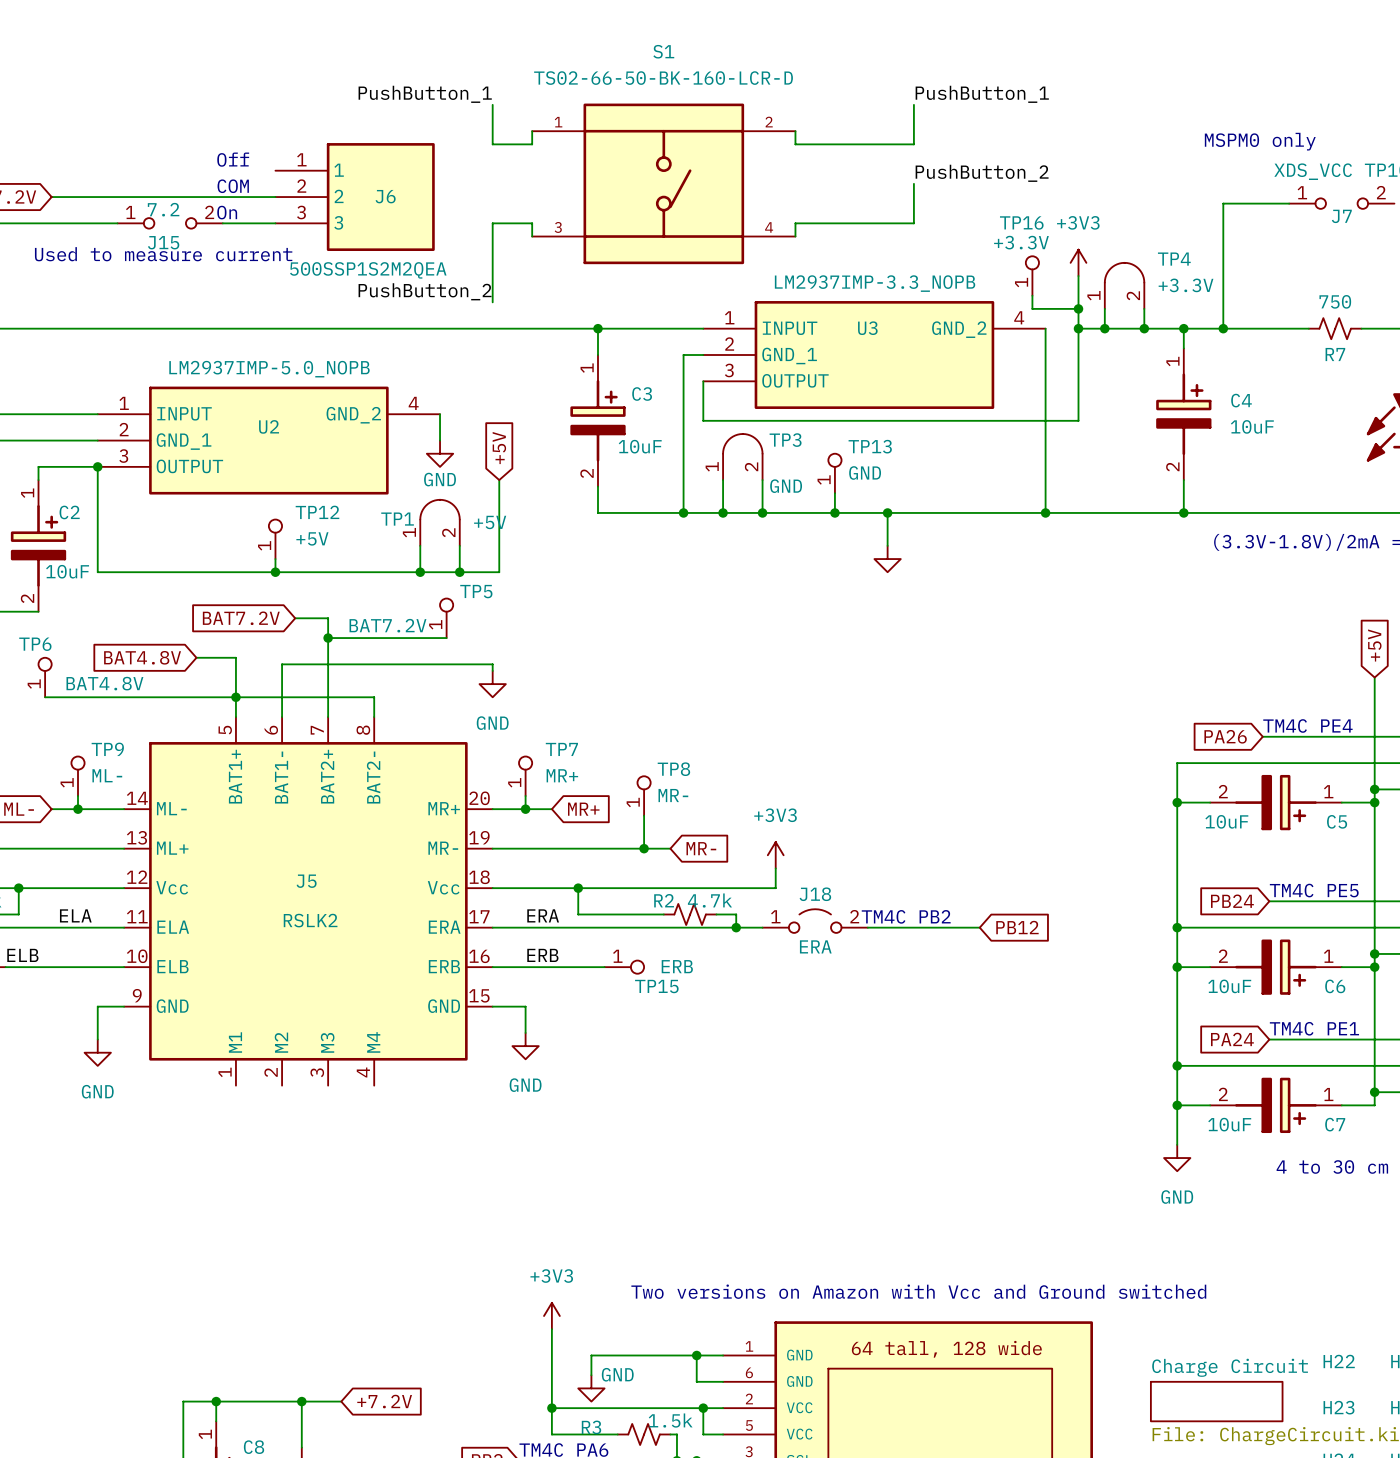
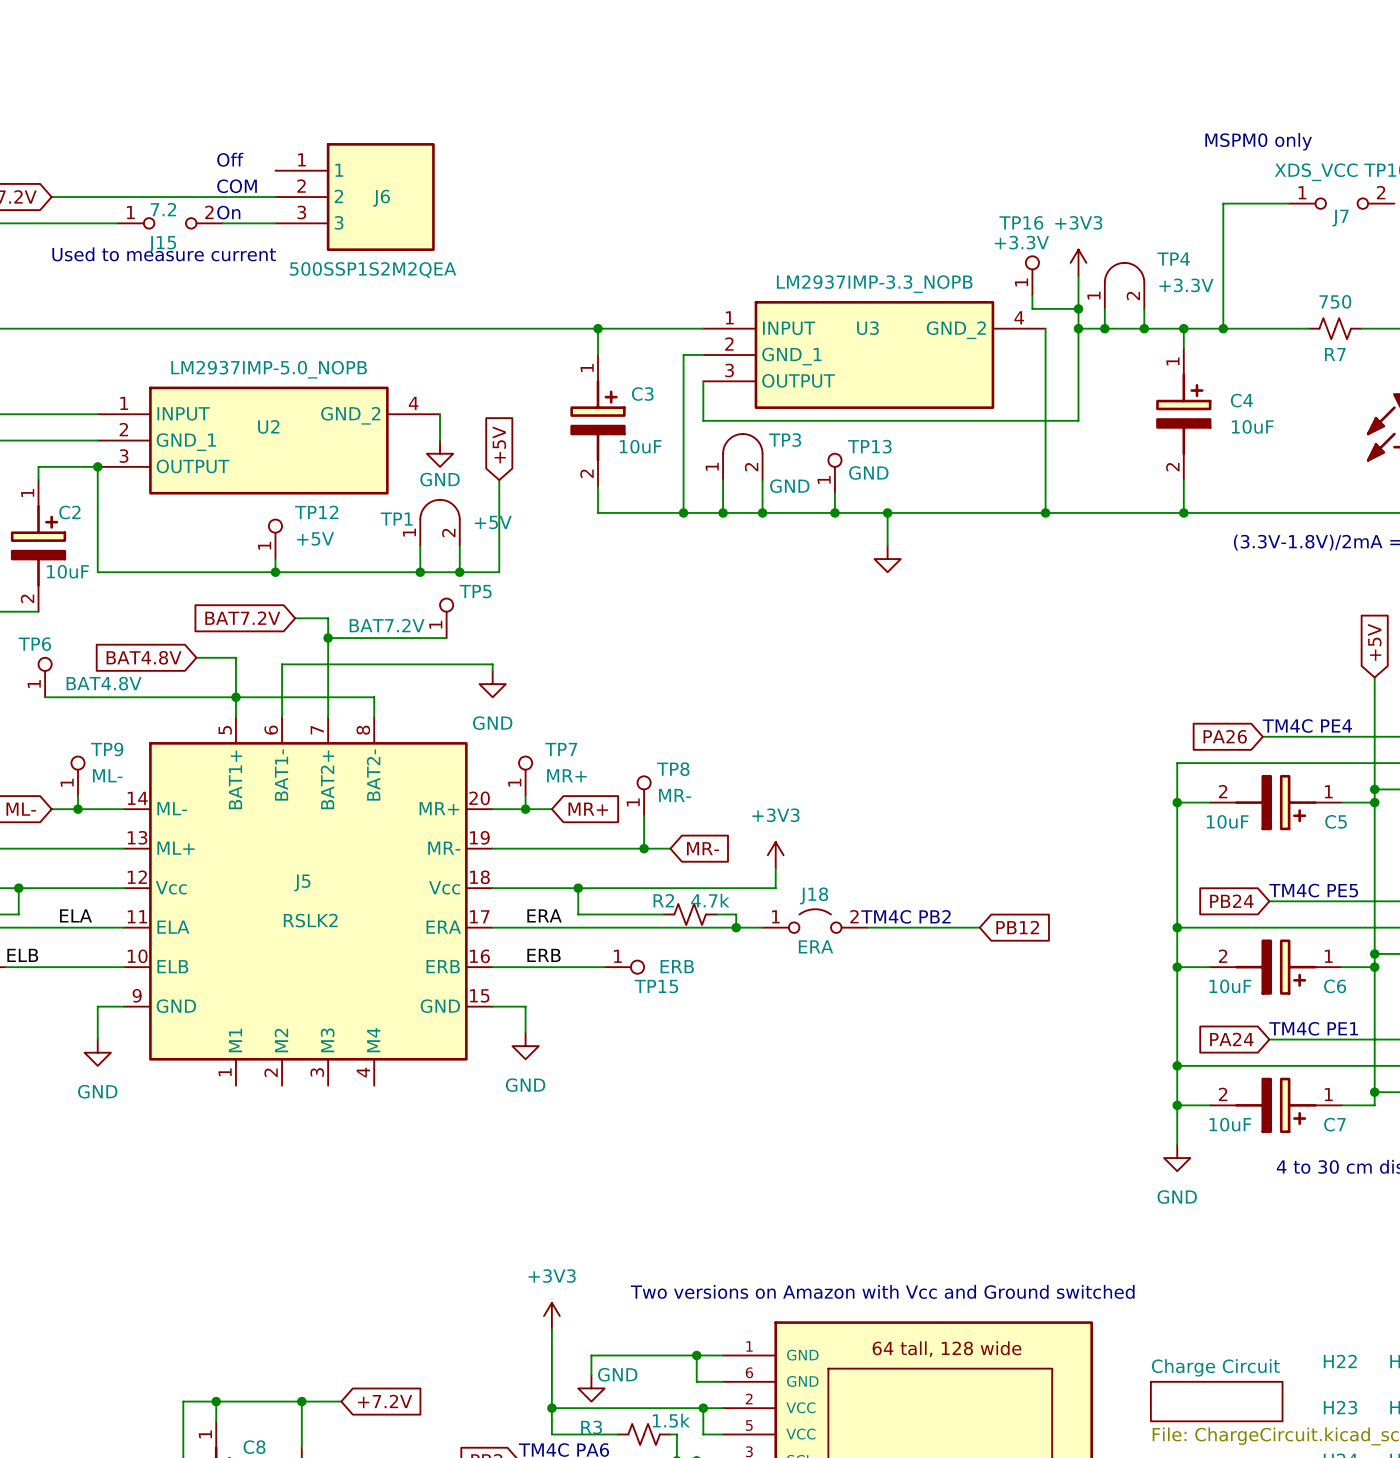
label: PushButton_1 (425, 94) -> none
label: PushButton_1 (982, 94) -> none
wire: (492, 104) (492, 144) (532, 144) (532, 131) -> none
wire: (913, 104) (913, 144) (795, 144) (795, 131) -> none
label: PushButton_2 (982, 173) -> none
S1: TS02-66-50-BK-160-LCR-D (663, 183) -> none
wire: (913, 183) (913, 223) (795, 223) (795, 236) -> none
wire: (532, 236) (532, 223) (492, 223) (492, 302) -> none
label: PushButton_2 (425, 291) -> none

